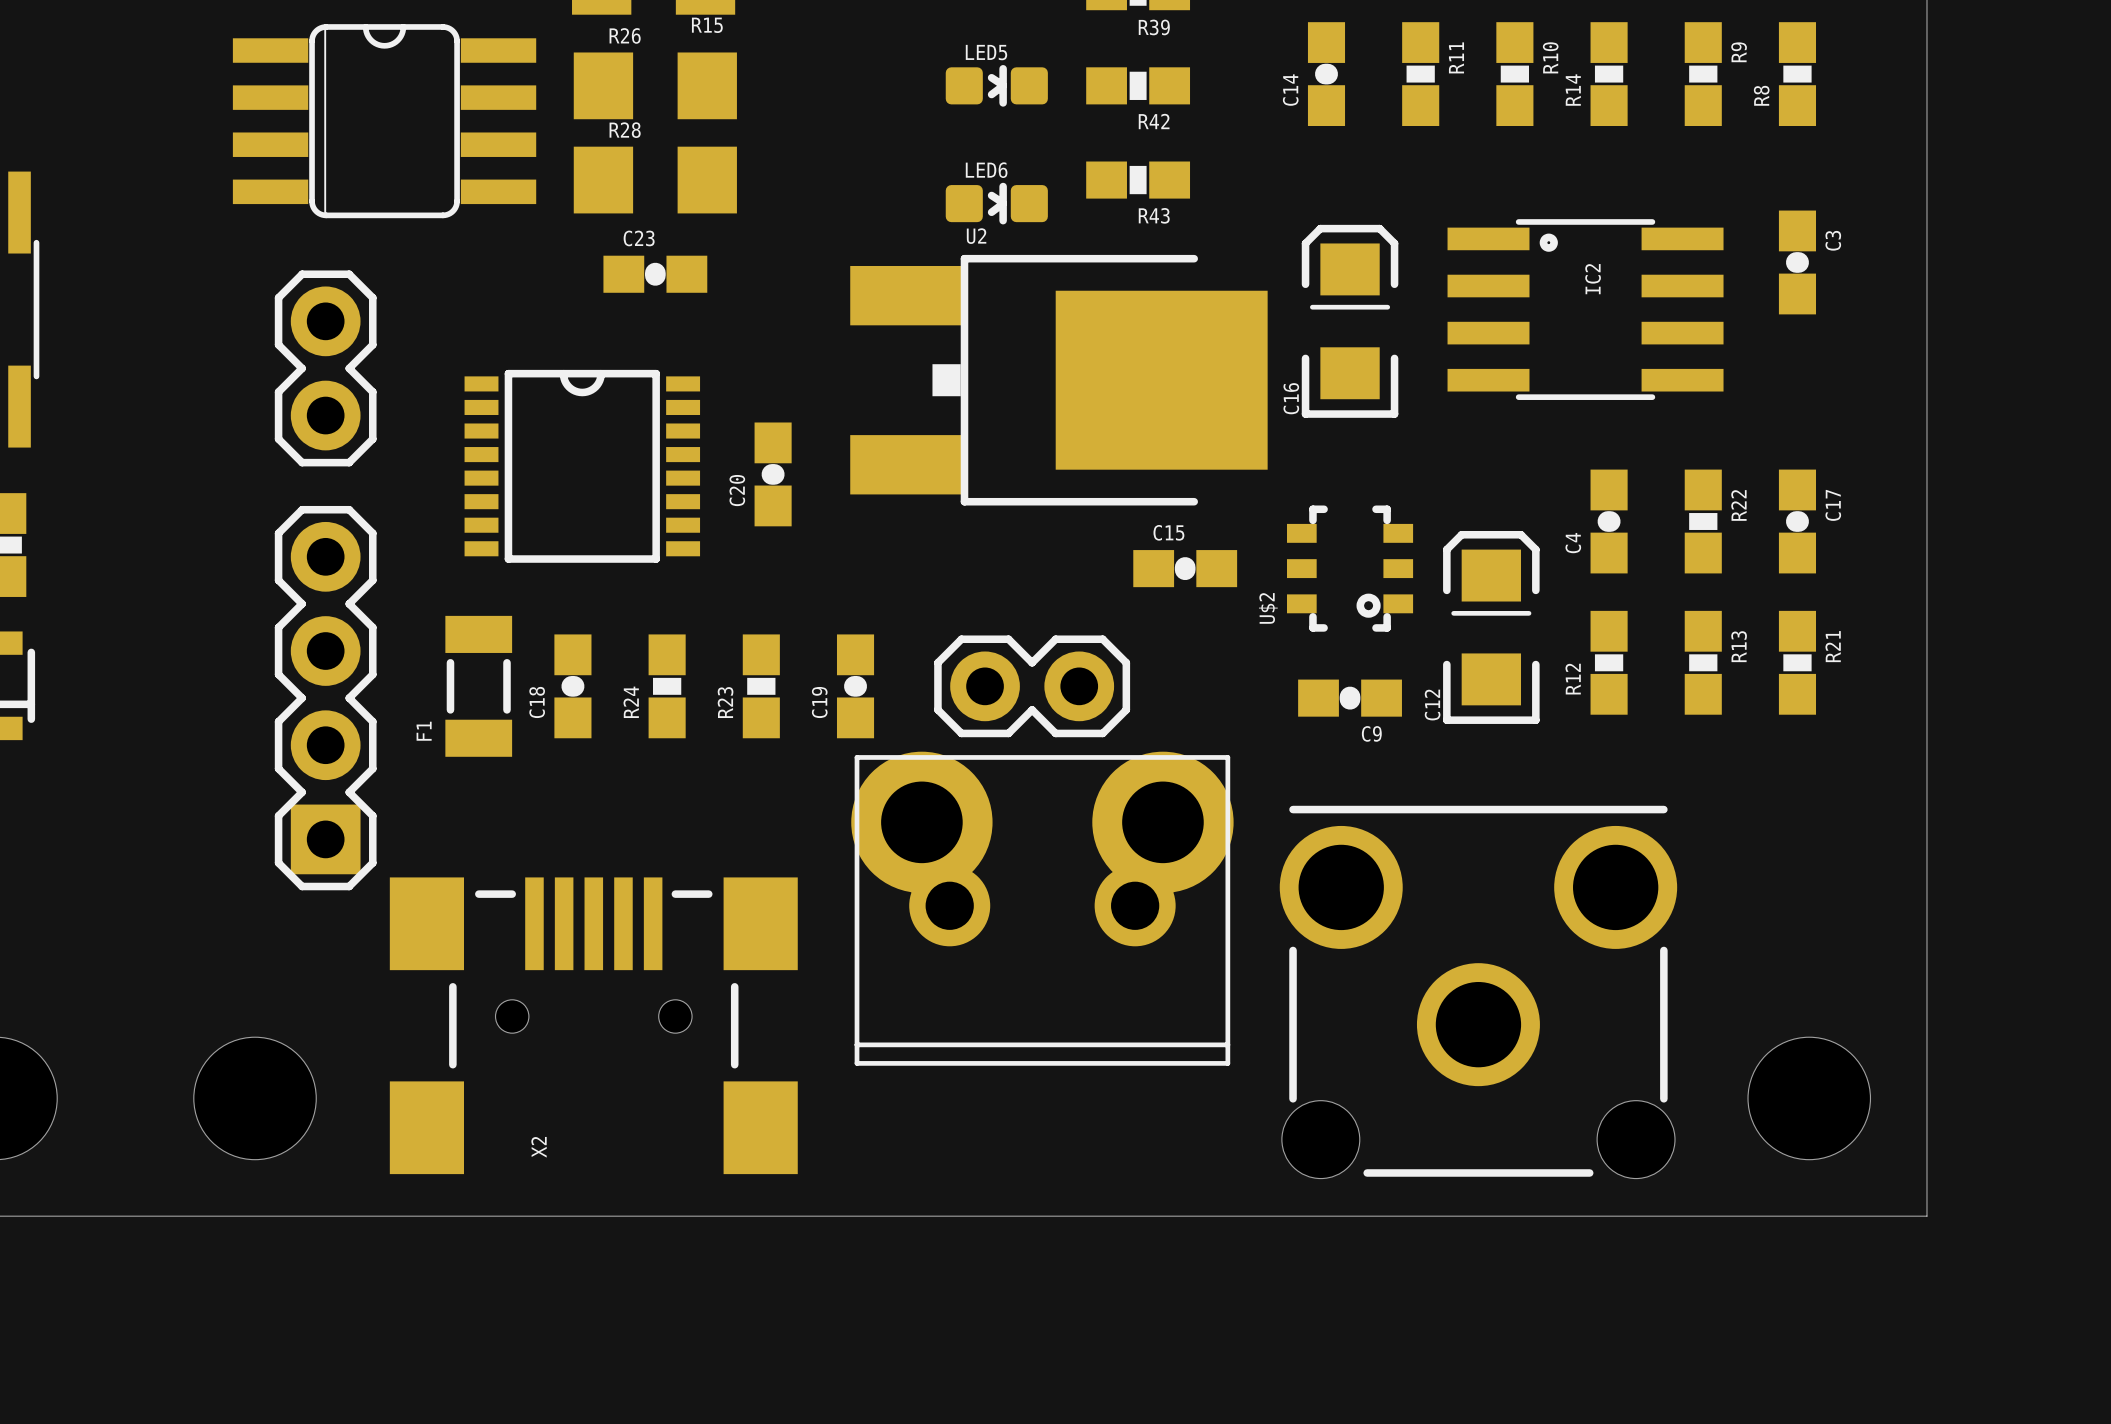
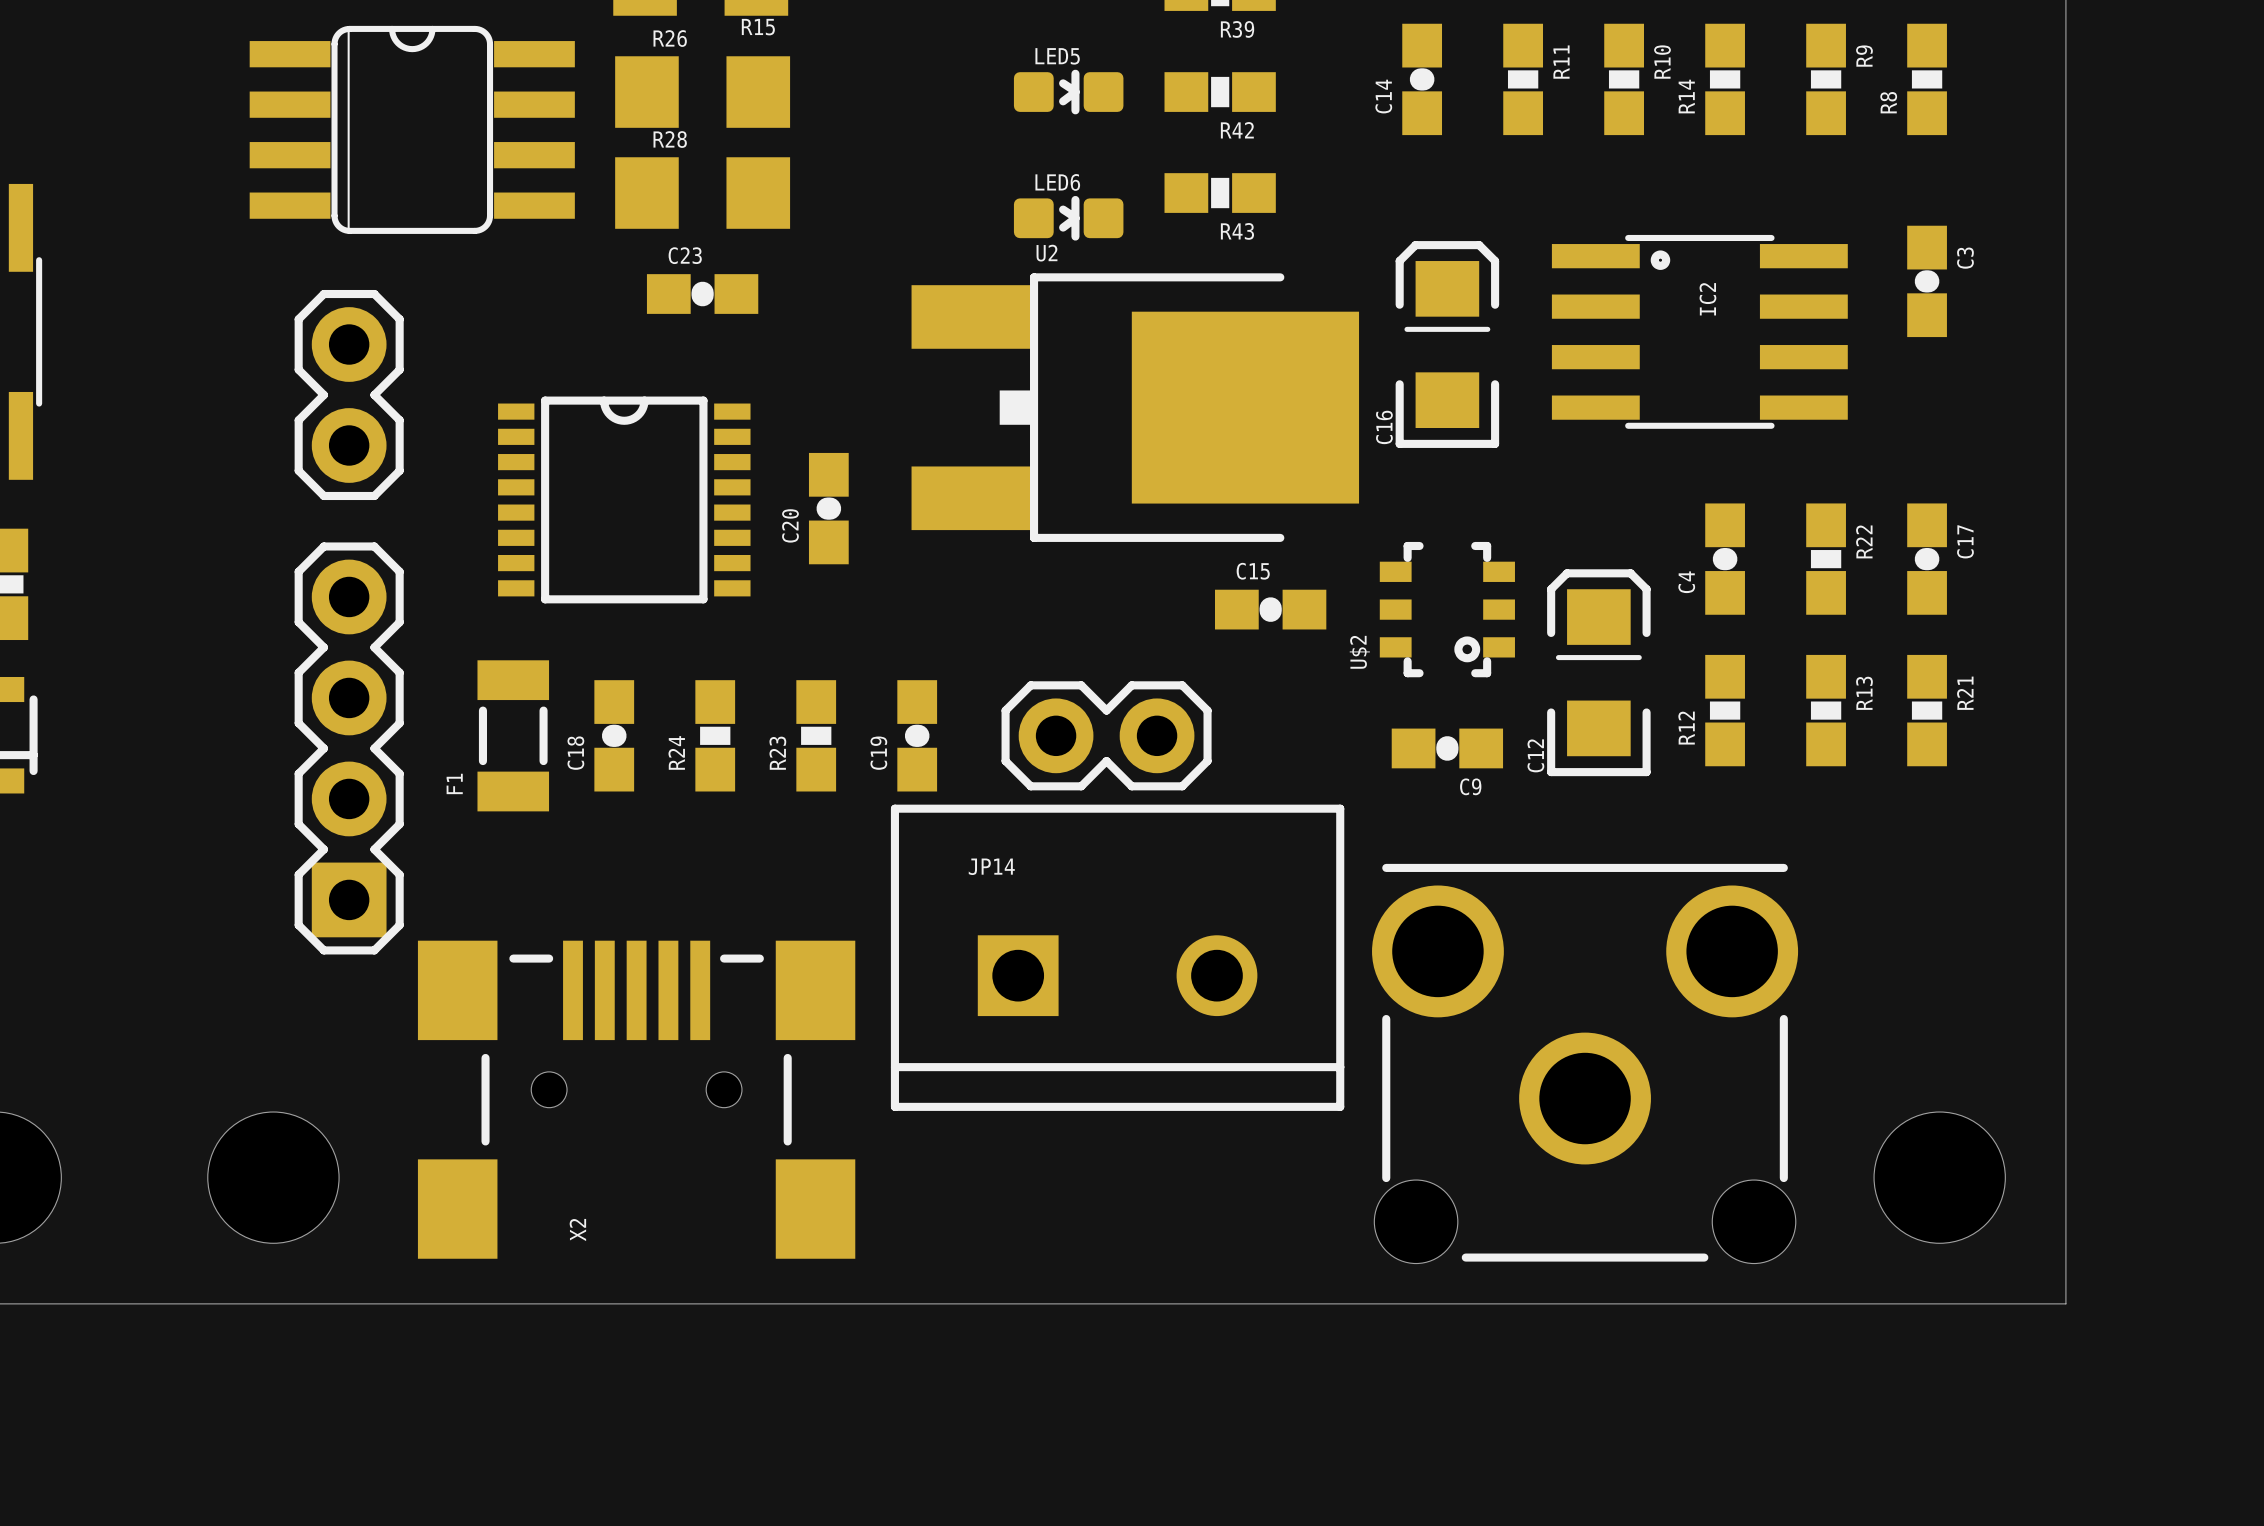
JP14: none -> (1117, 957)
part: (1042, 908) -> none

